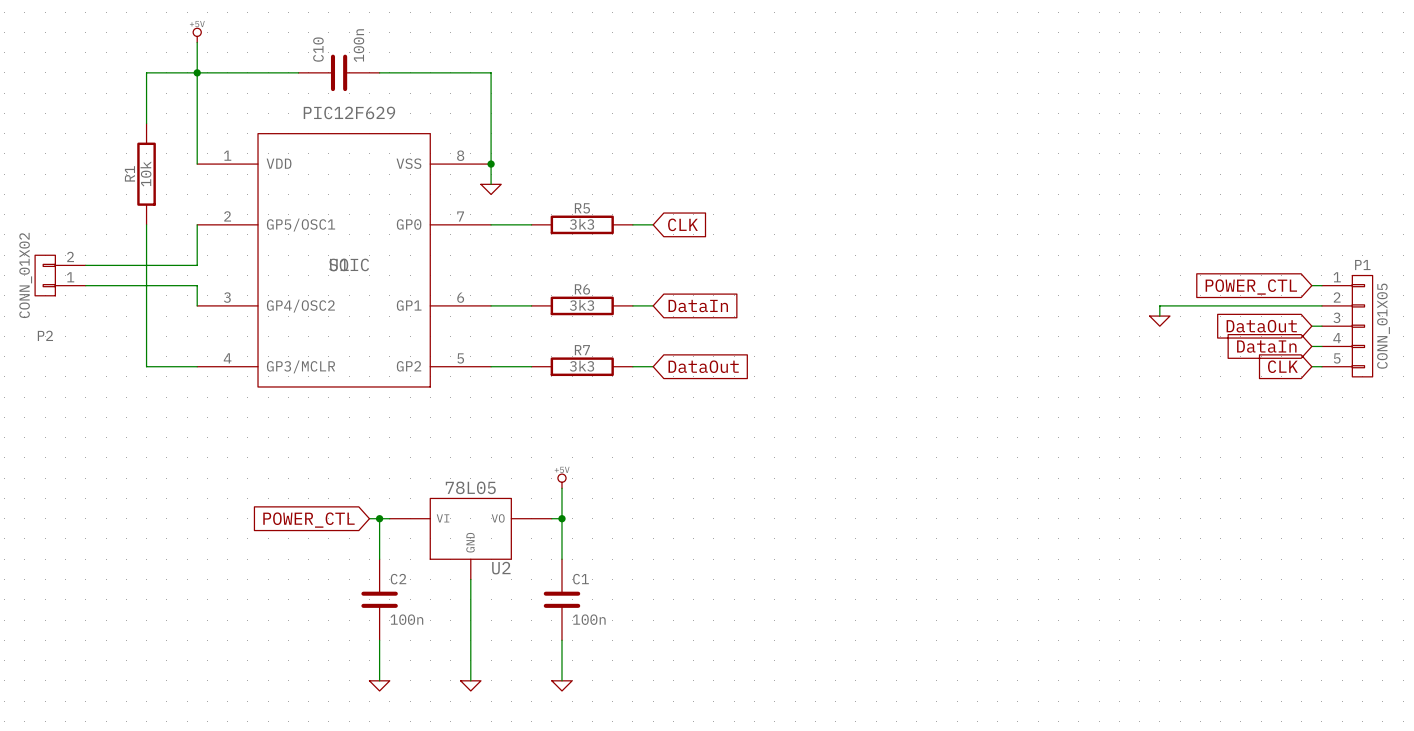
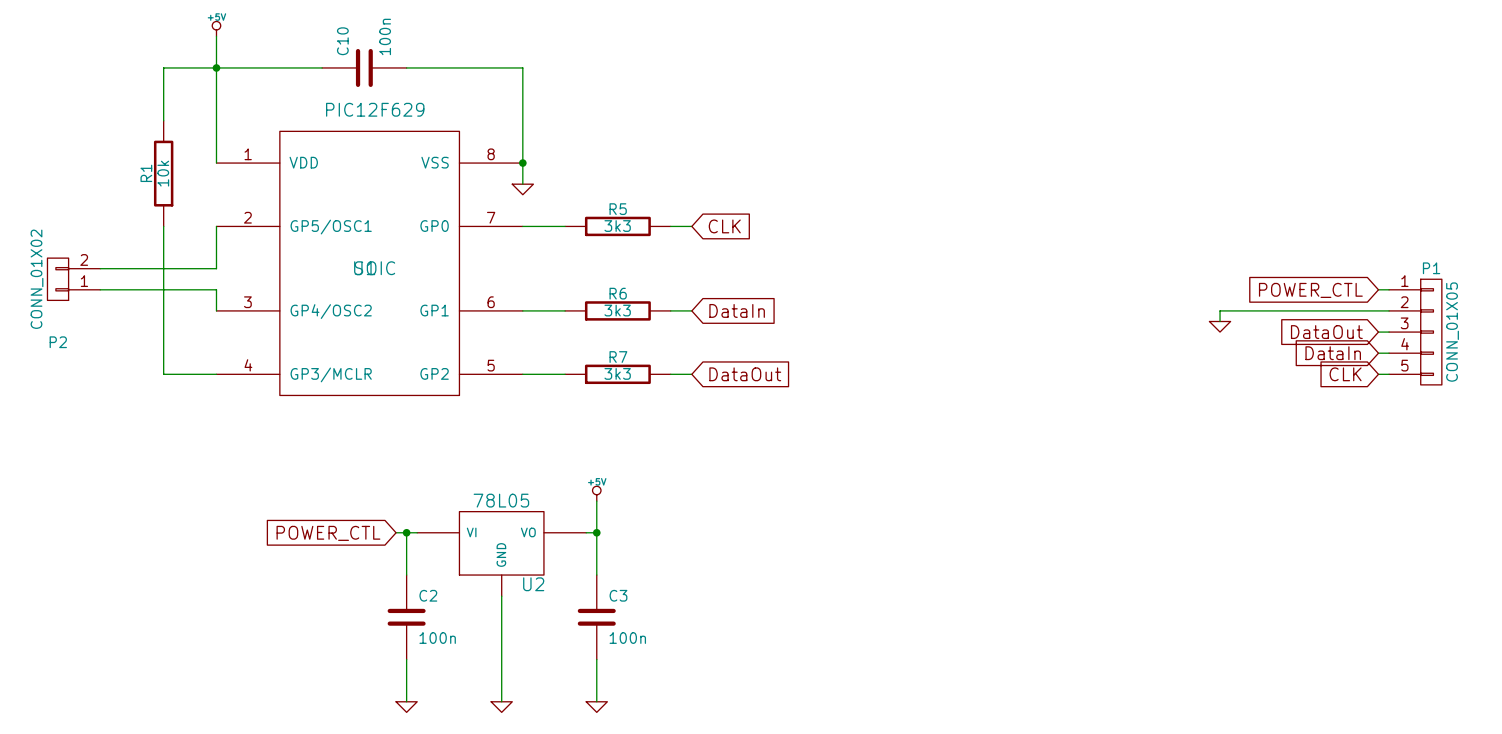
C1 name: C1 (581, 579) -> C3 (618, 595)

